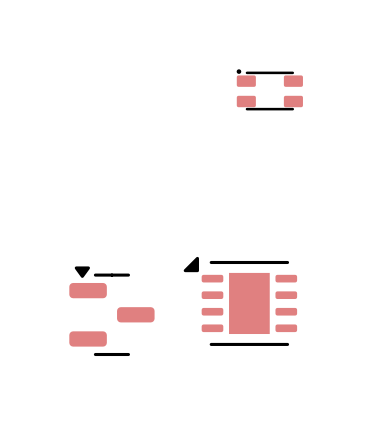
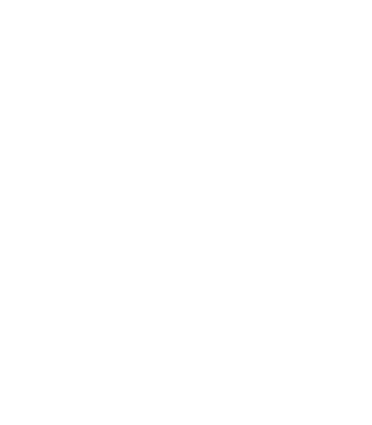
part: (269, 89) -> none
part: (240, 301) -> none
part: (111, 311) -> none

